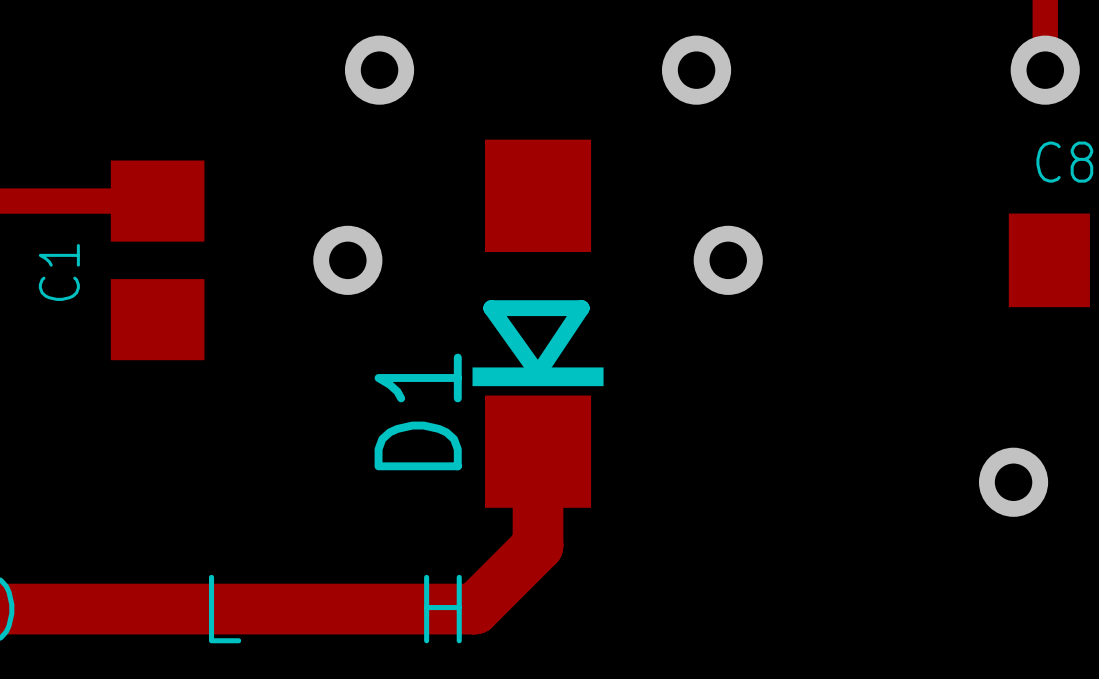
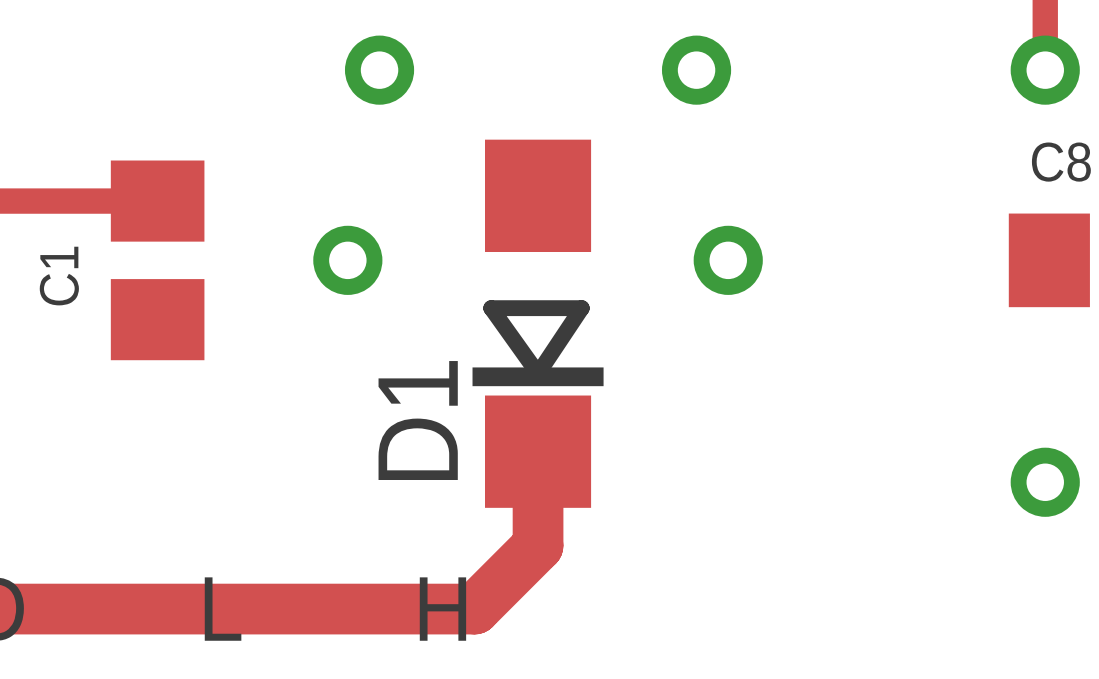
via position: (1013, 482) -> (1045, 482)

